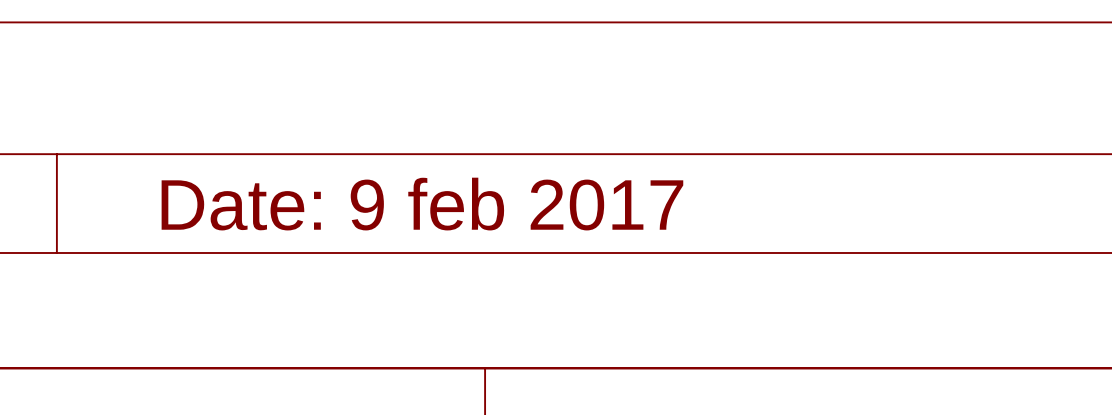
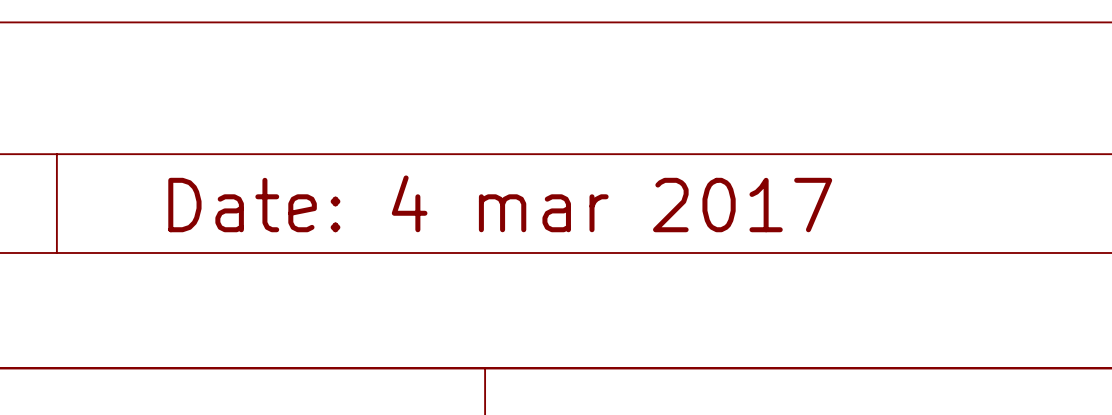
title block: Date: 9 feb 2017 (422, 204) -> Date: 4 mar 2017 (500, 203)

